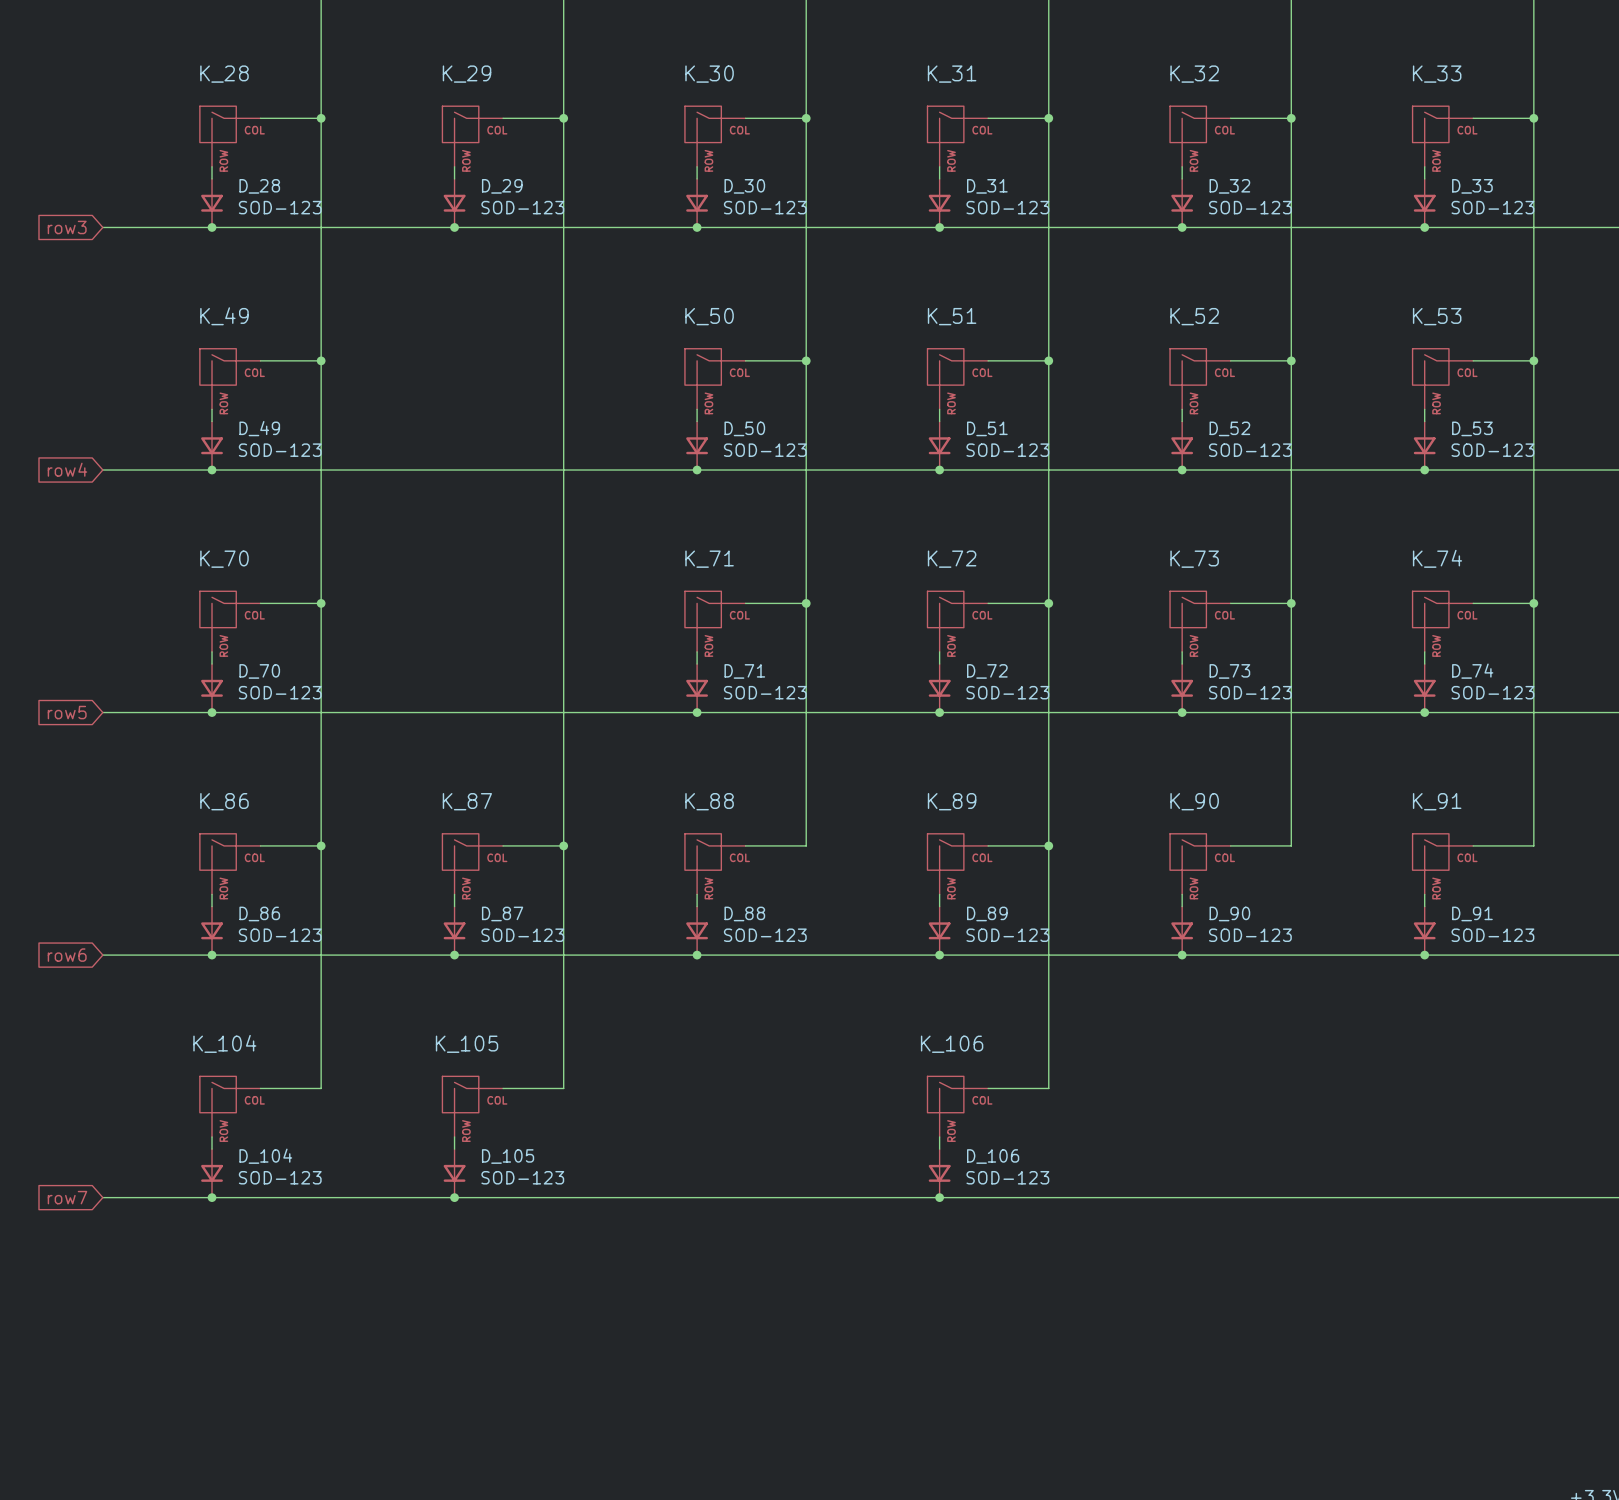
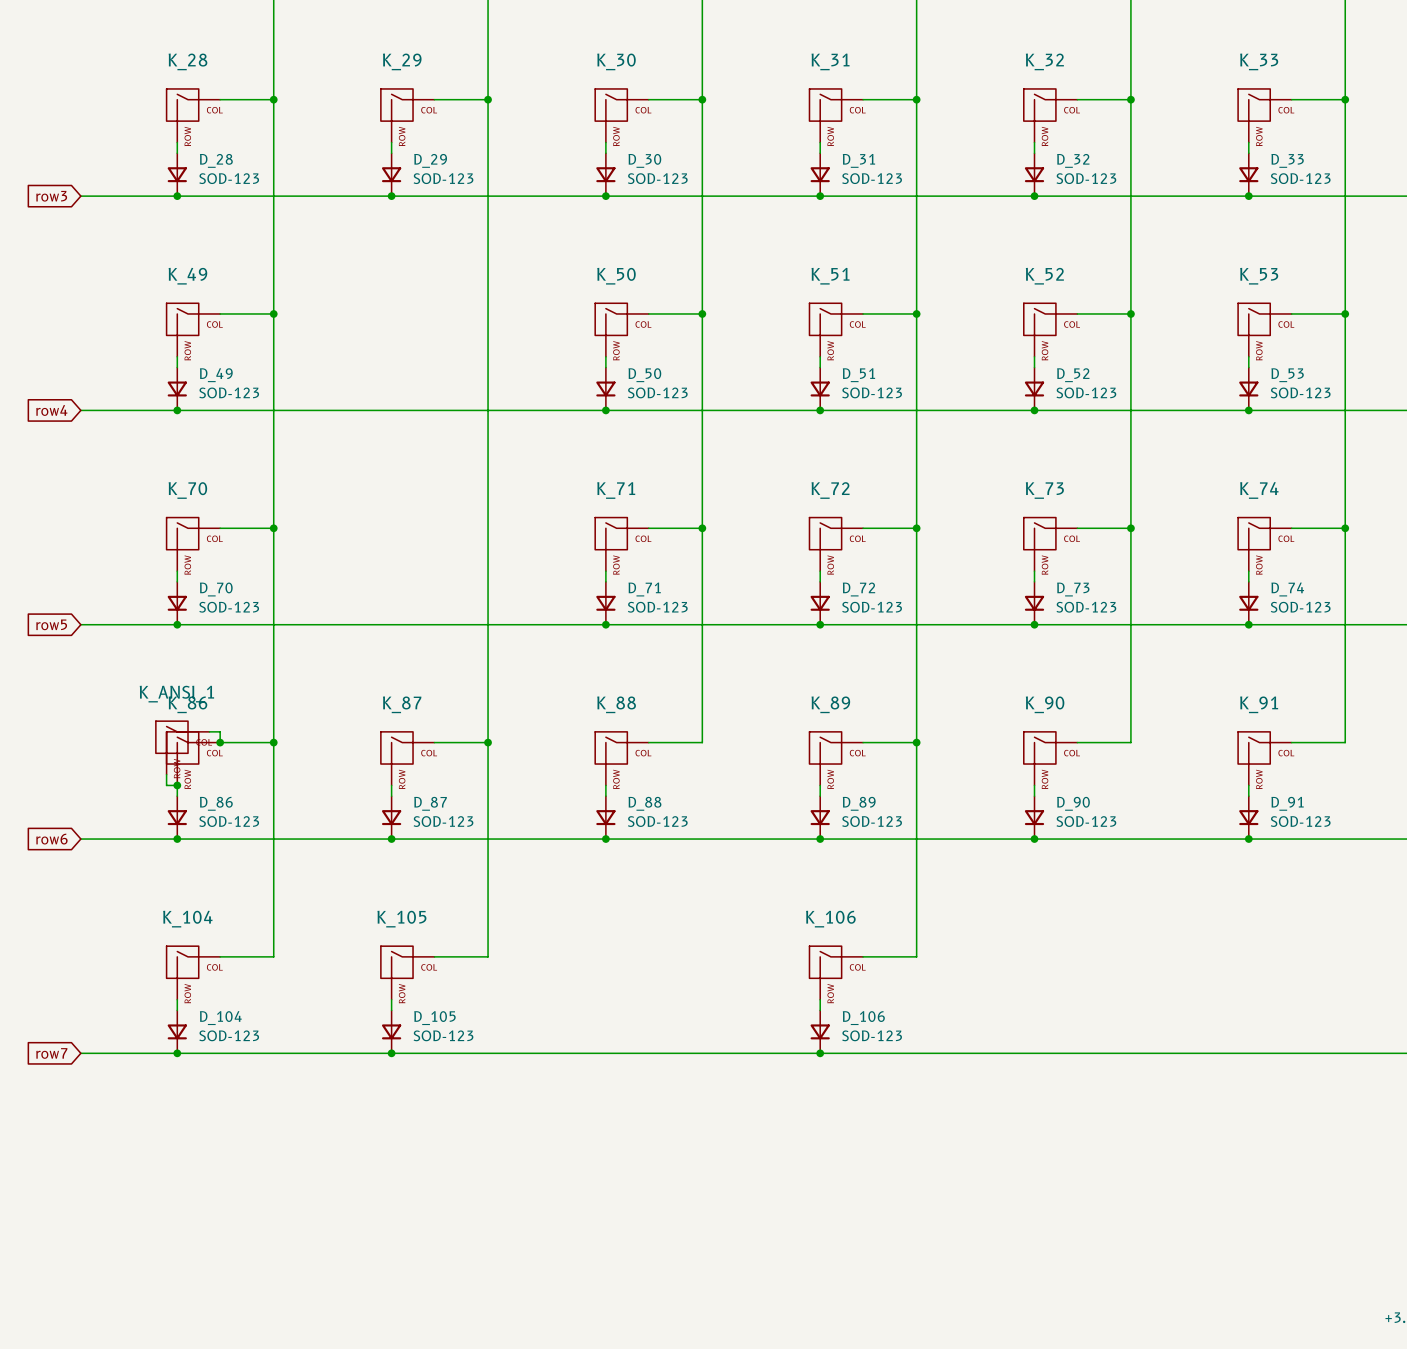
wire: none -> (209, 731) (220, 731) (220, 742)
junction: none -> (220, 742)
K_ANSI_1: none -> (182, 747)
wire: none -> (166, 774) (166, 785) (177, 785)
junction: none -> (177, 785)

